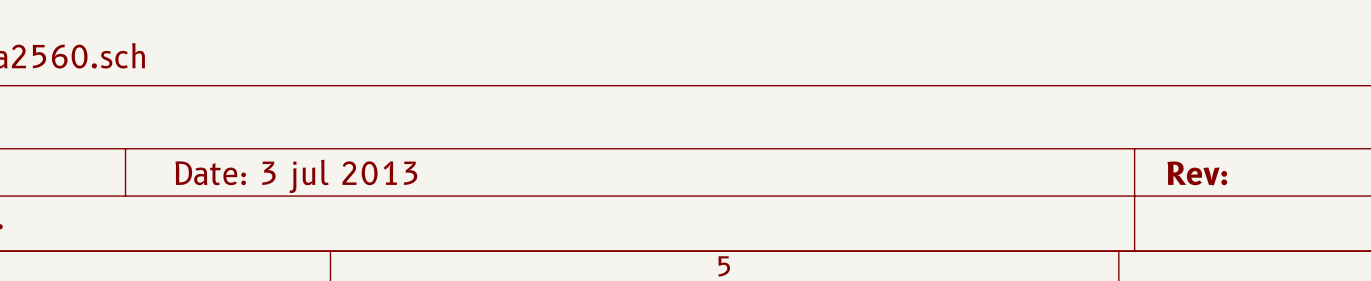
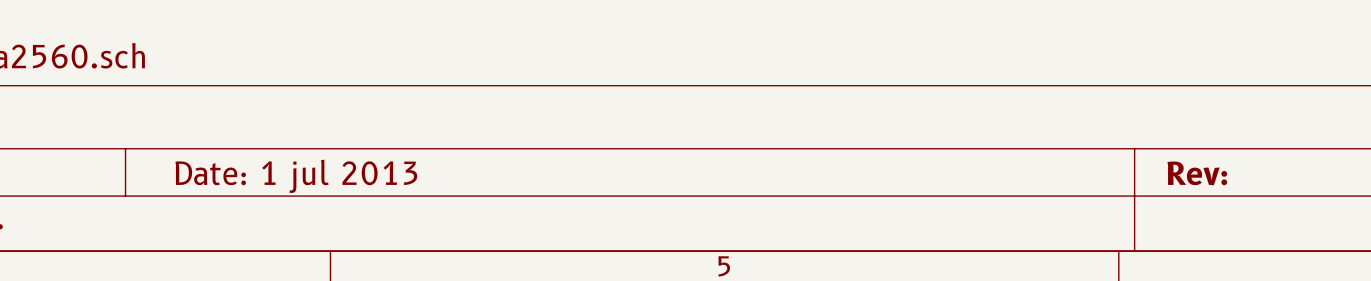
title block: Date: 3 jul 2013 (296, 176) -> Date: 1 jul 2013 (296, 176)

